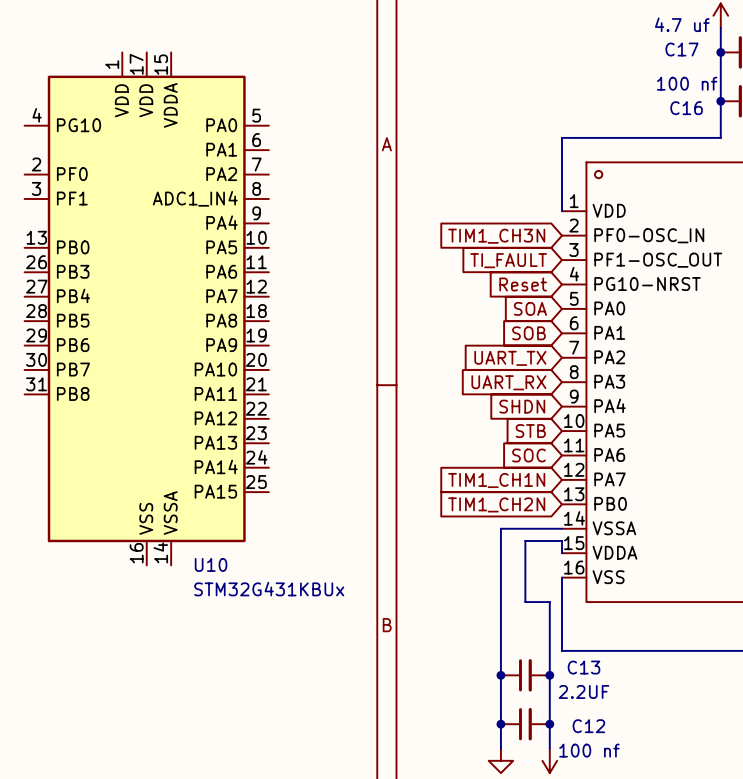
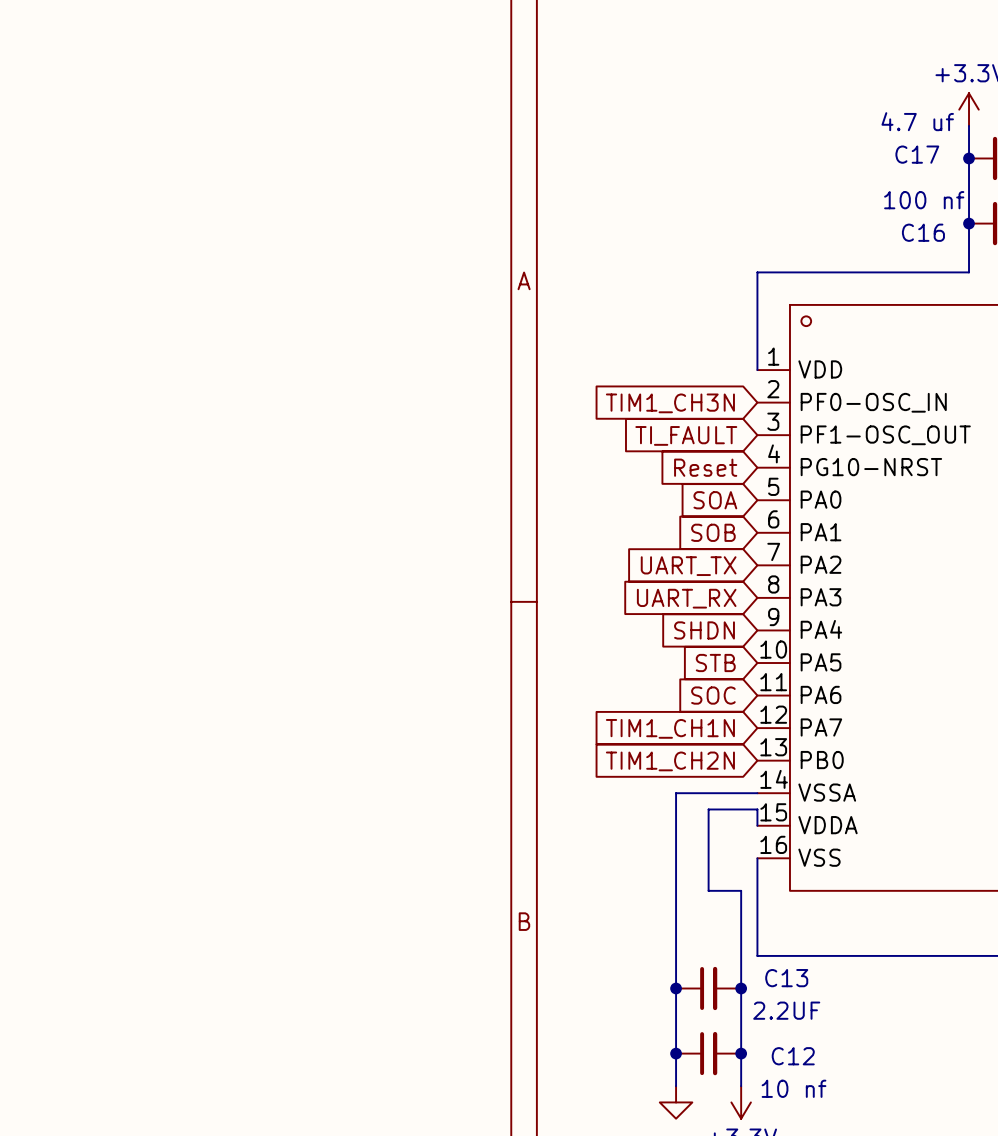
U10: STM32G431KBUx (146, 308) -> none
C12 value: 100 nf (589, 750) -> 10 nf (794, 1088)

